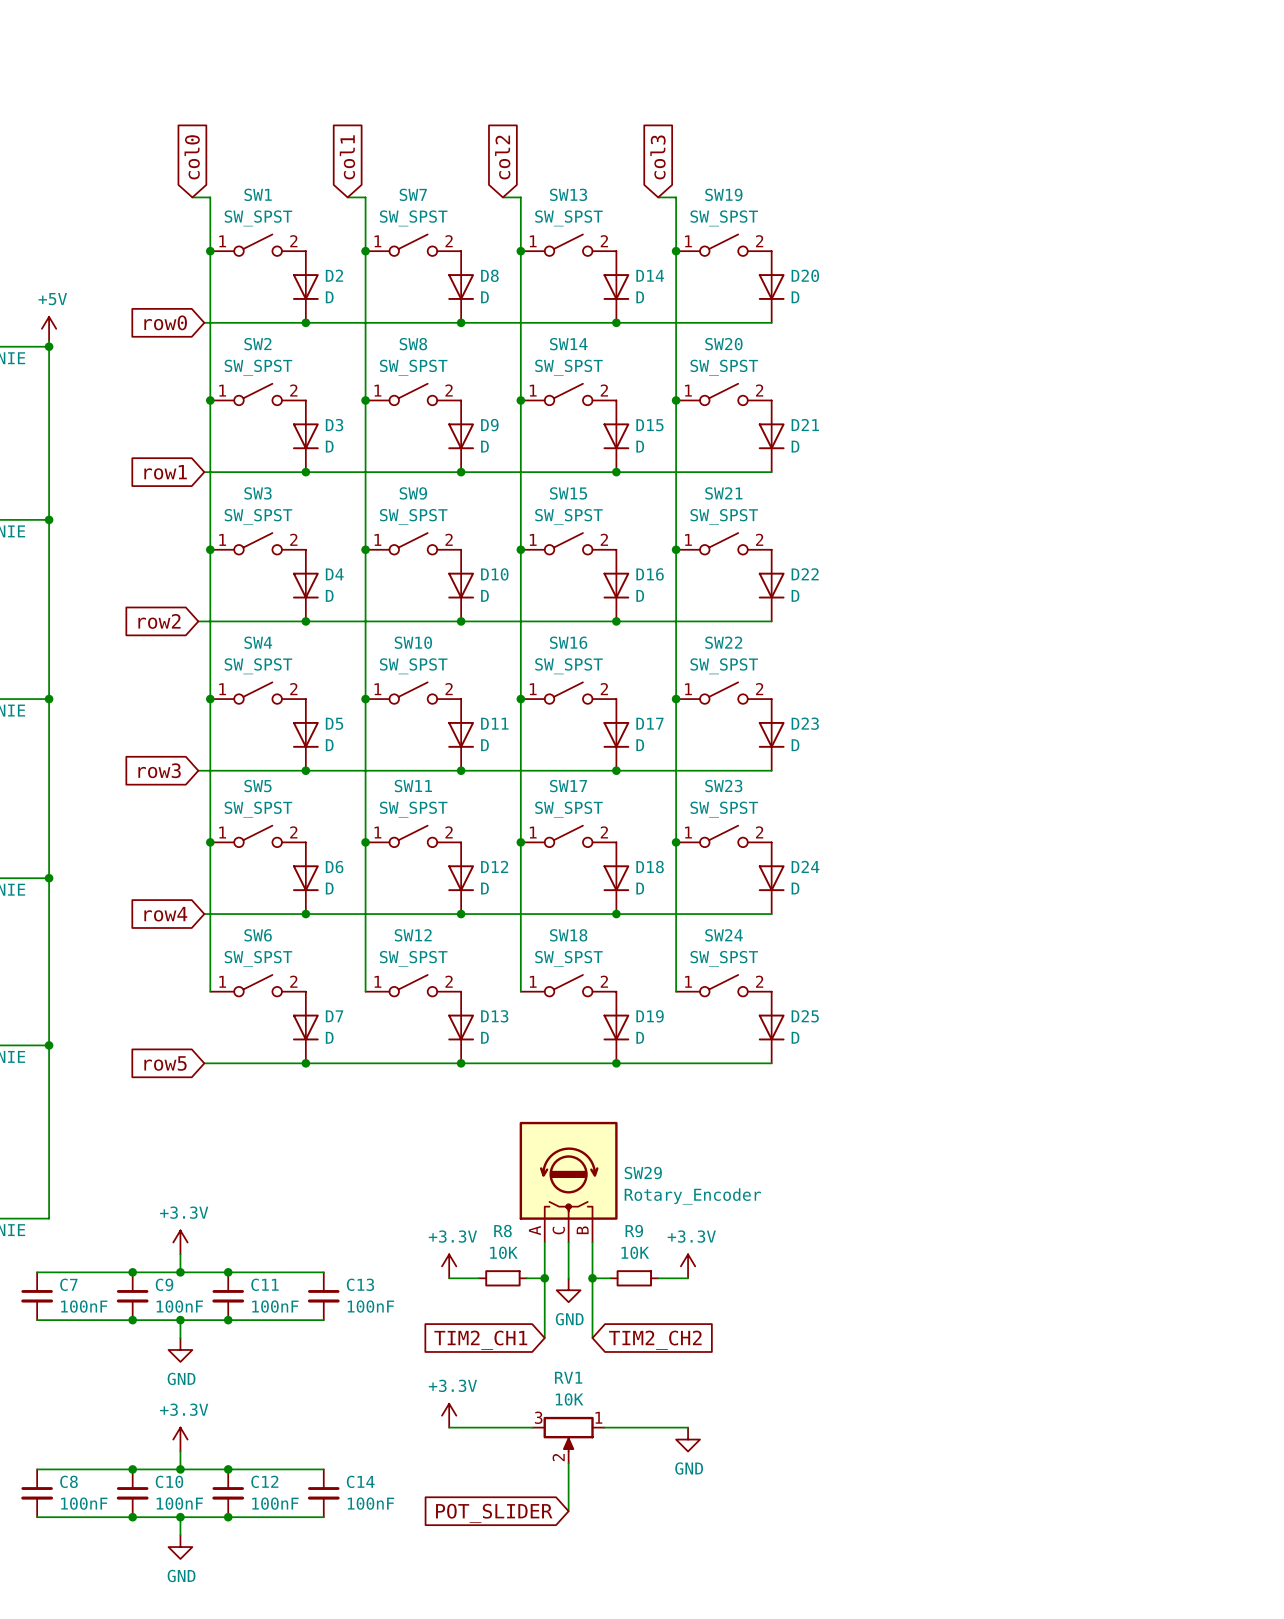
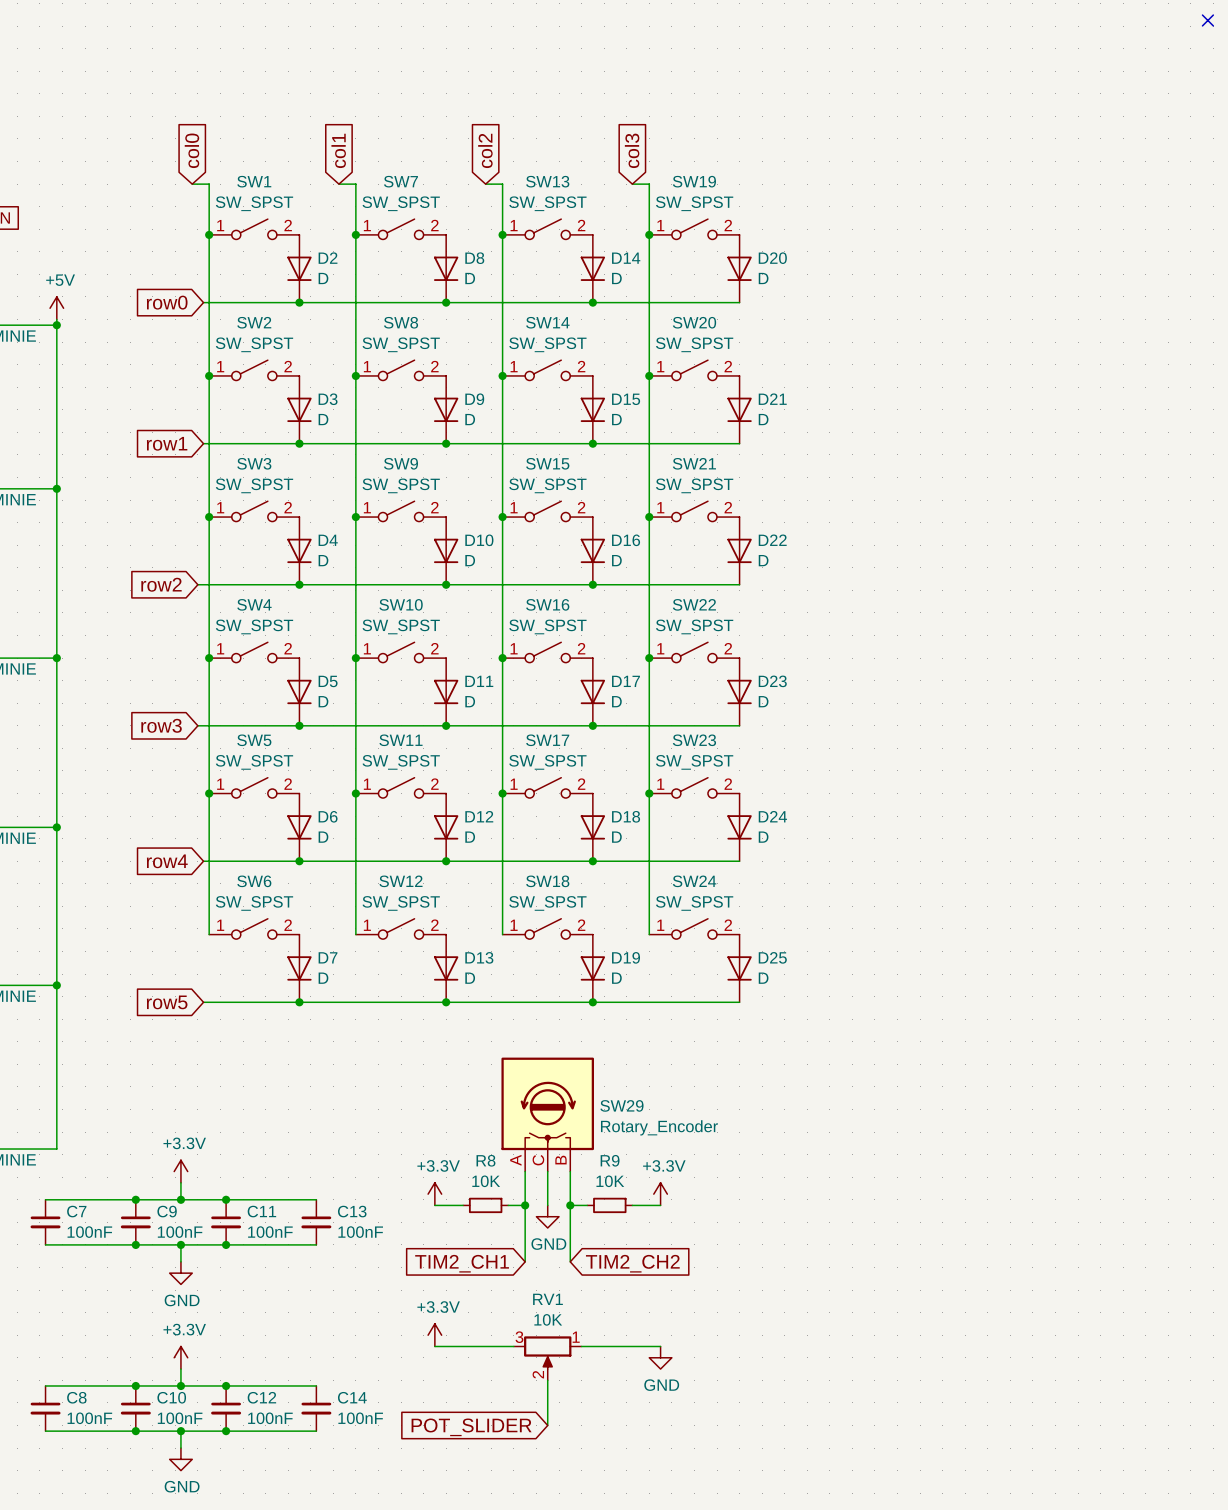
no-connect mark: none -> (1207, 20)

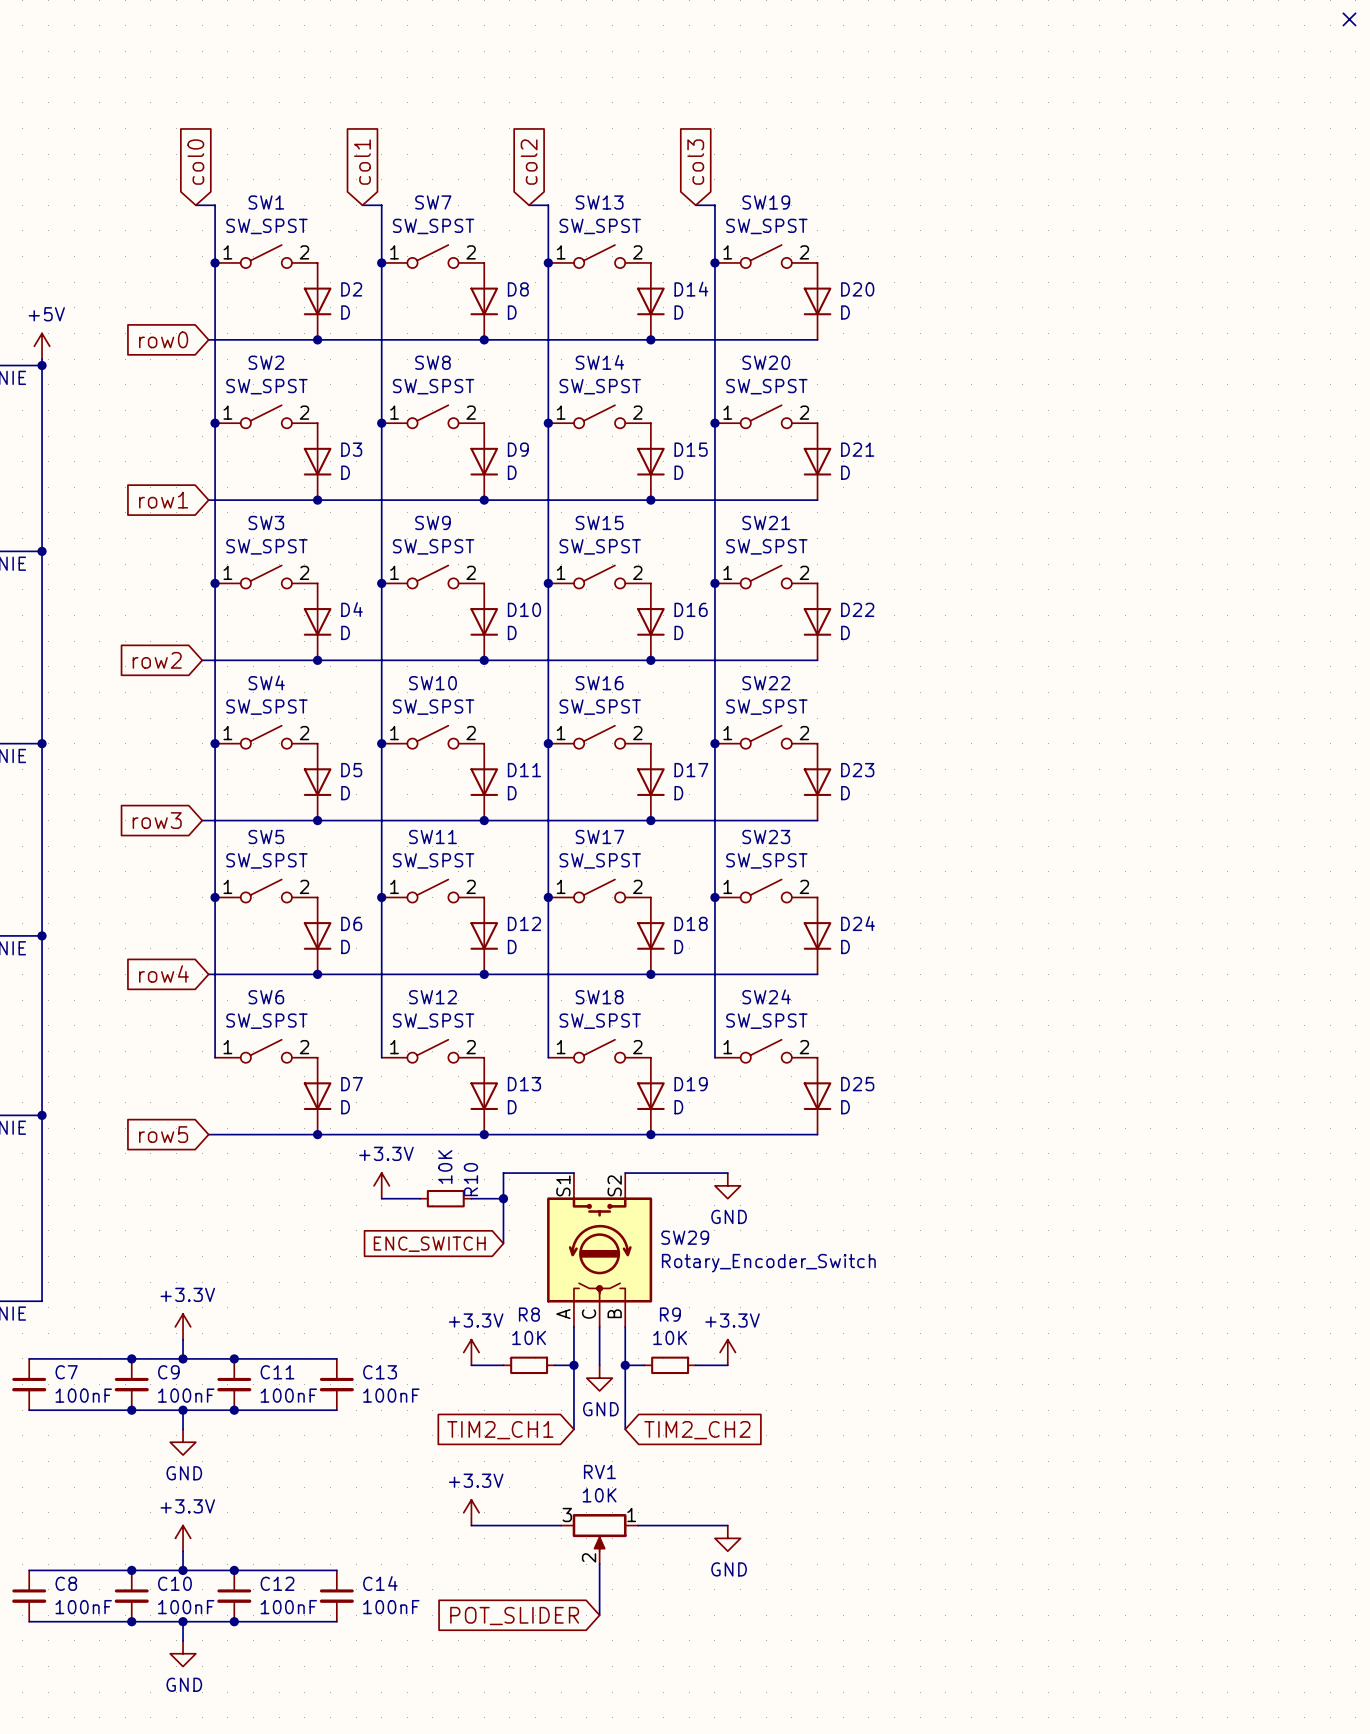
wire: none -> (573, 1173) (503, 1173) (503, 1243)
wire: none -> (625, 1173) (727, 1173)
power symbol: none -> +3.3V (381, 1185)
power symbol: none -> GND (727, 1185)
SW29 symbol: [501, 1057, 594, 1172] -> [547, 1173, 653, 1327]
wire: none -> (381, 1198) (420, 1198)
R10: none -> 10K (445, 1198)
wire: none -> (471, 1198) (503, 1198)
junction: none -> (503, 1198)
global label: none -> ENC_SWITCH (429, 1244)
SW29 value: Rotary_Encoder (659, 1127) -> Rotary_Encoder_Switch (768, 1263)

